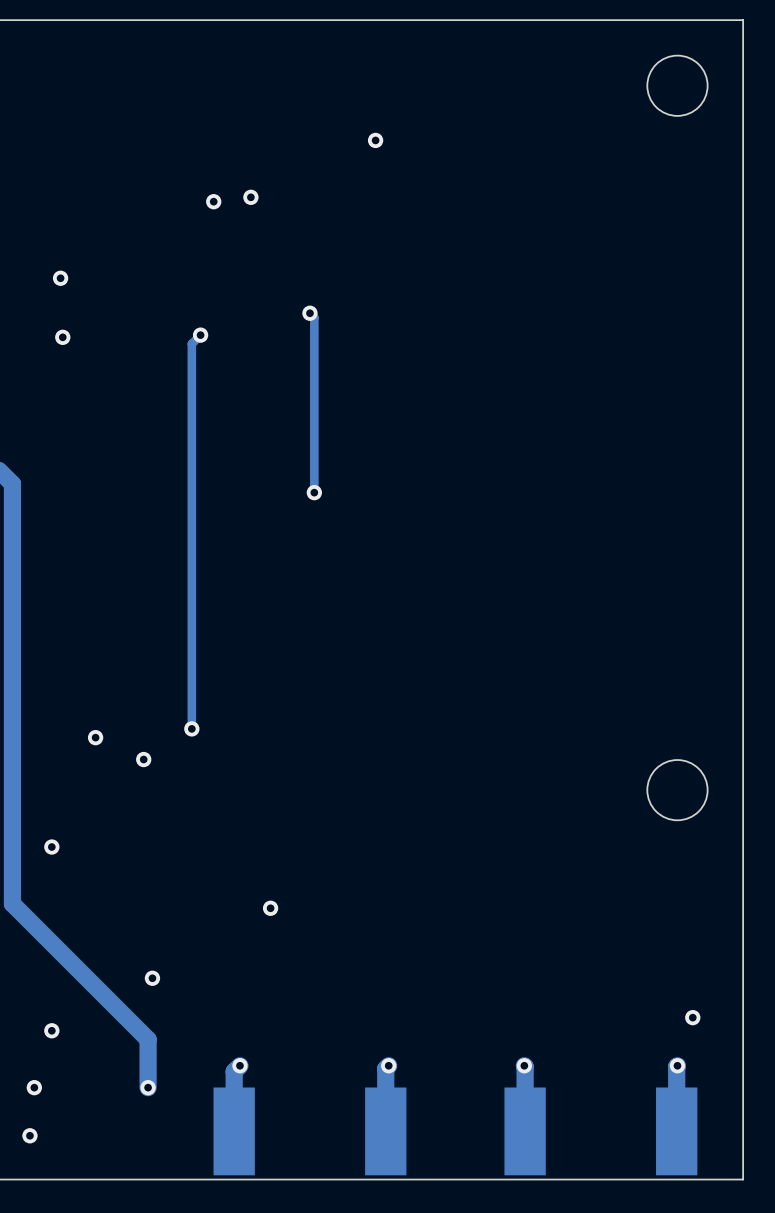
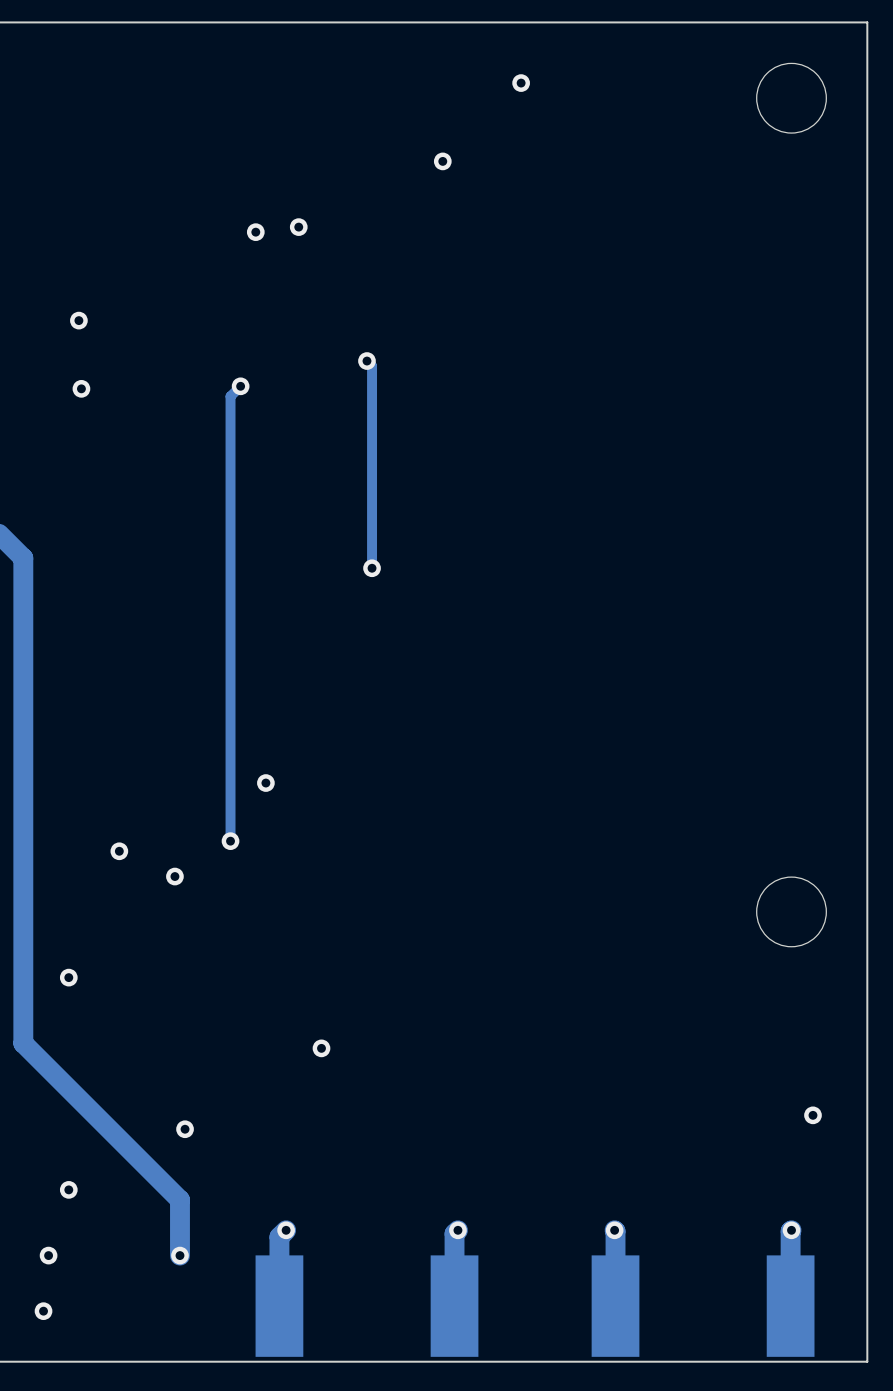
via: none -> (521, 83)
via: none -> (265, 783)
via position: (692, 1017) -> (812, 1115)

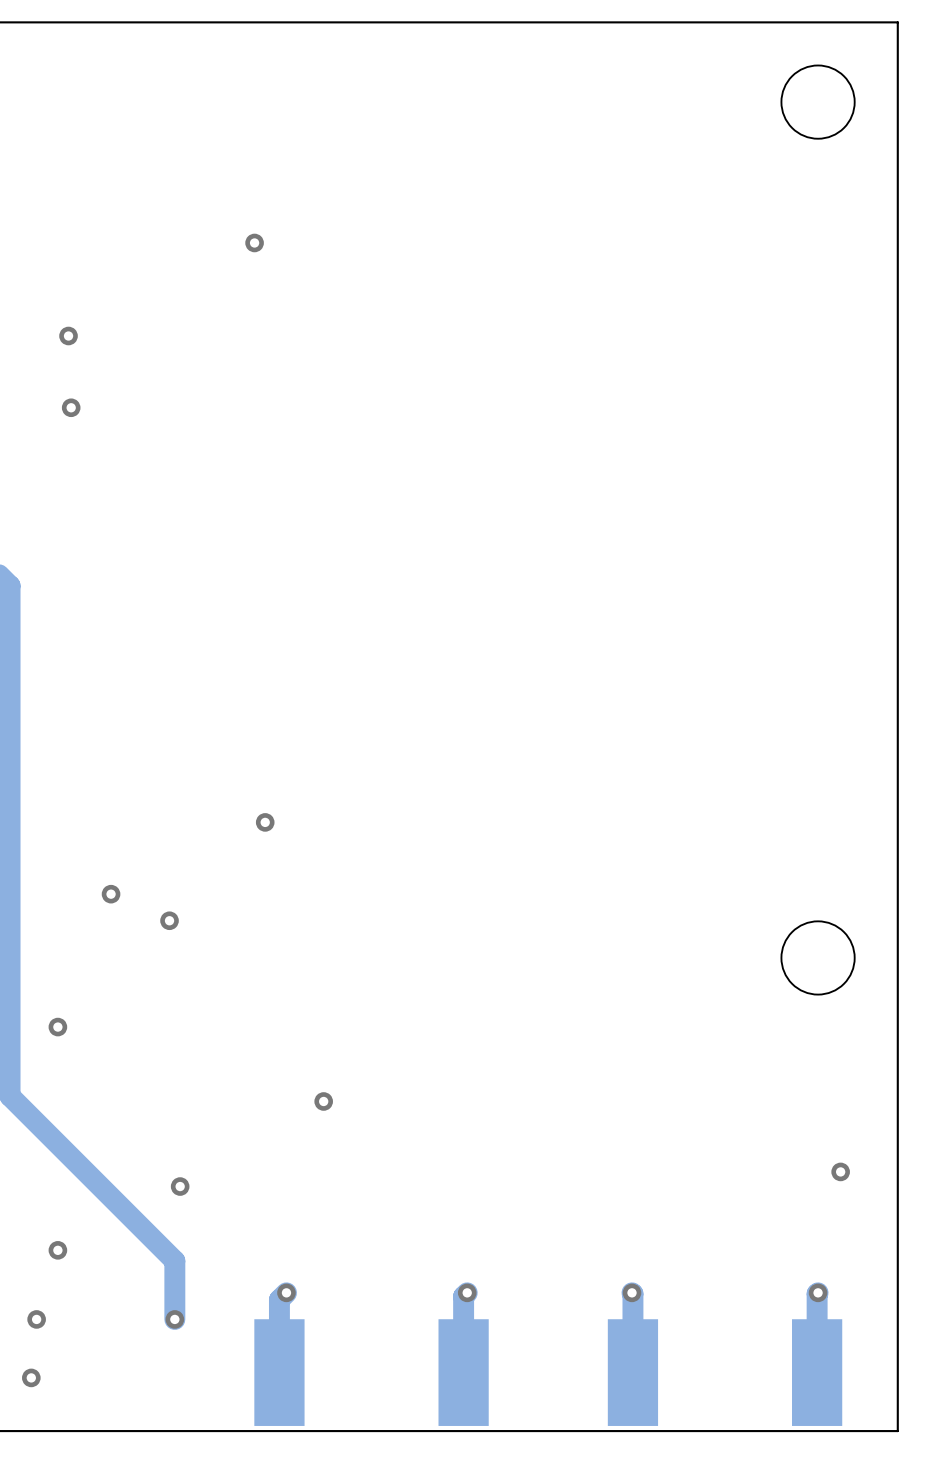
via: (521, 83) -> none
via: (442, 161) -> none
via: (298, 227) -> none
track: (366, 361) (372, 366) (372, 568) -> none
via: (366, 361) -> none
track: (240, 386) (230, 396) (230, 841) -> none
via: (240, 386) -> none
via: (372, 568) -> none
via: (230, 841) -> none

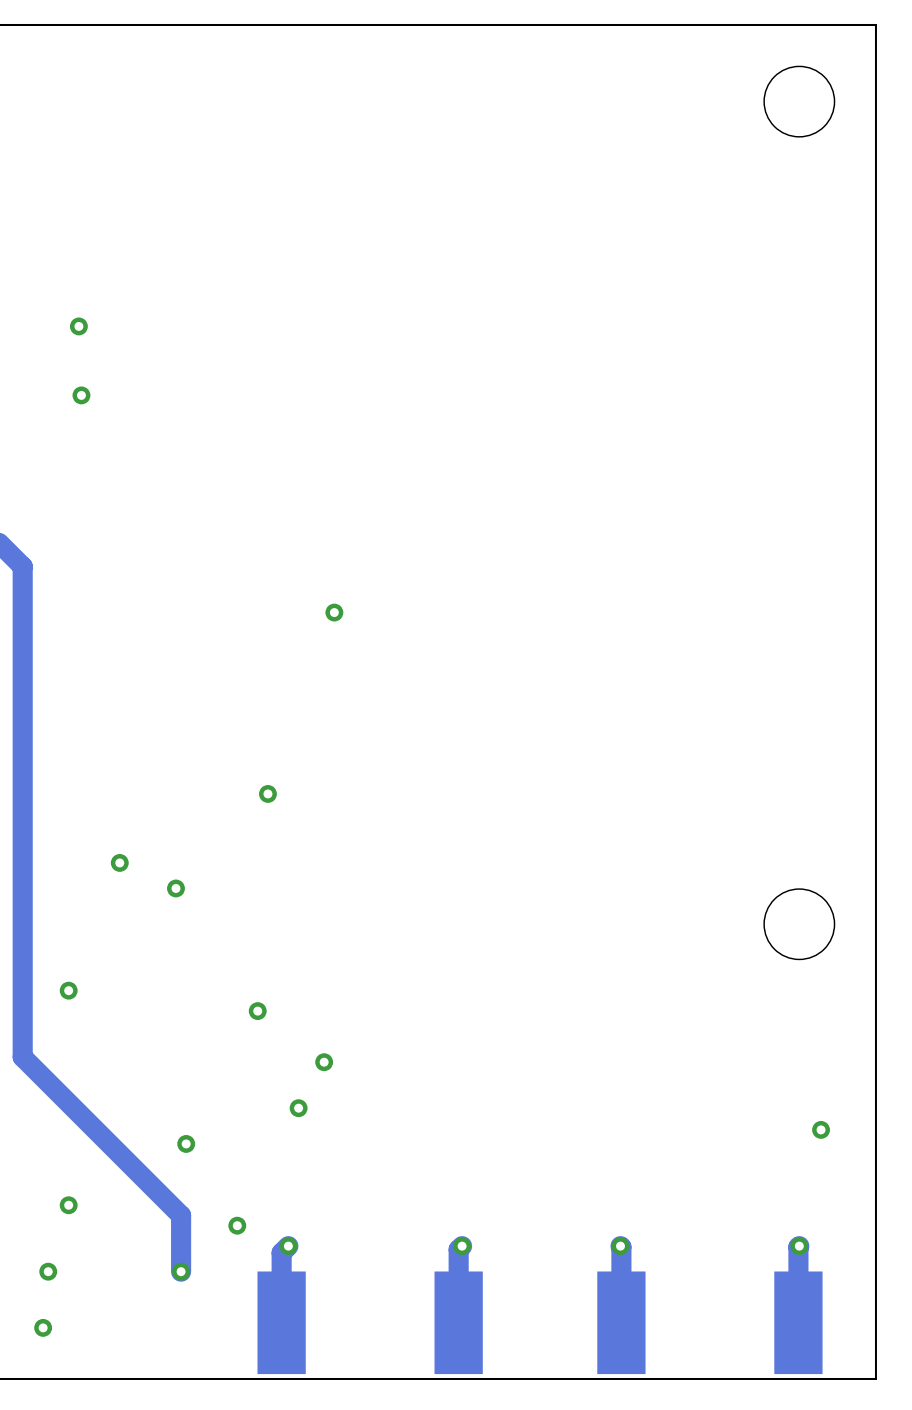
via: (254, 242) -> none
via: none -> (334, 612)
via: none -> (257, 1011)
via: none -> (298, 1108)
via: none -> (237, 1225)

